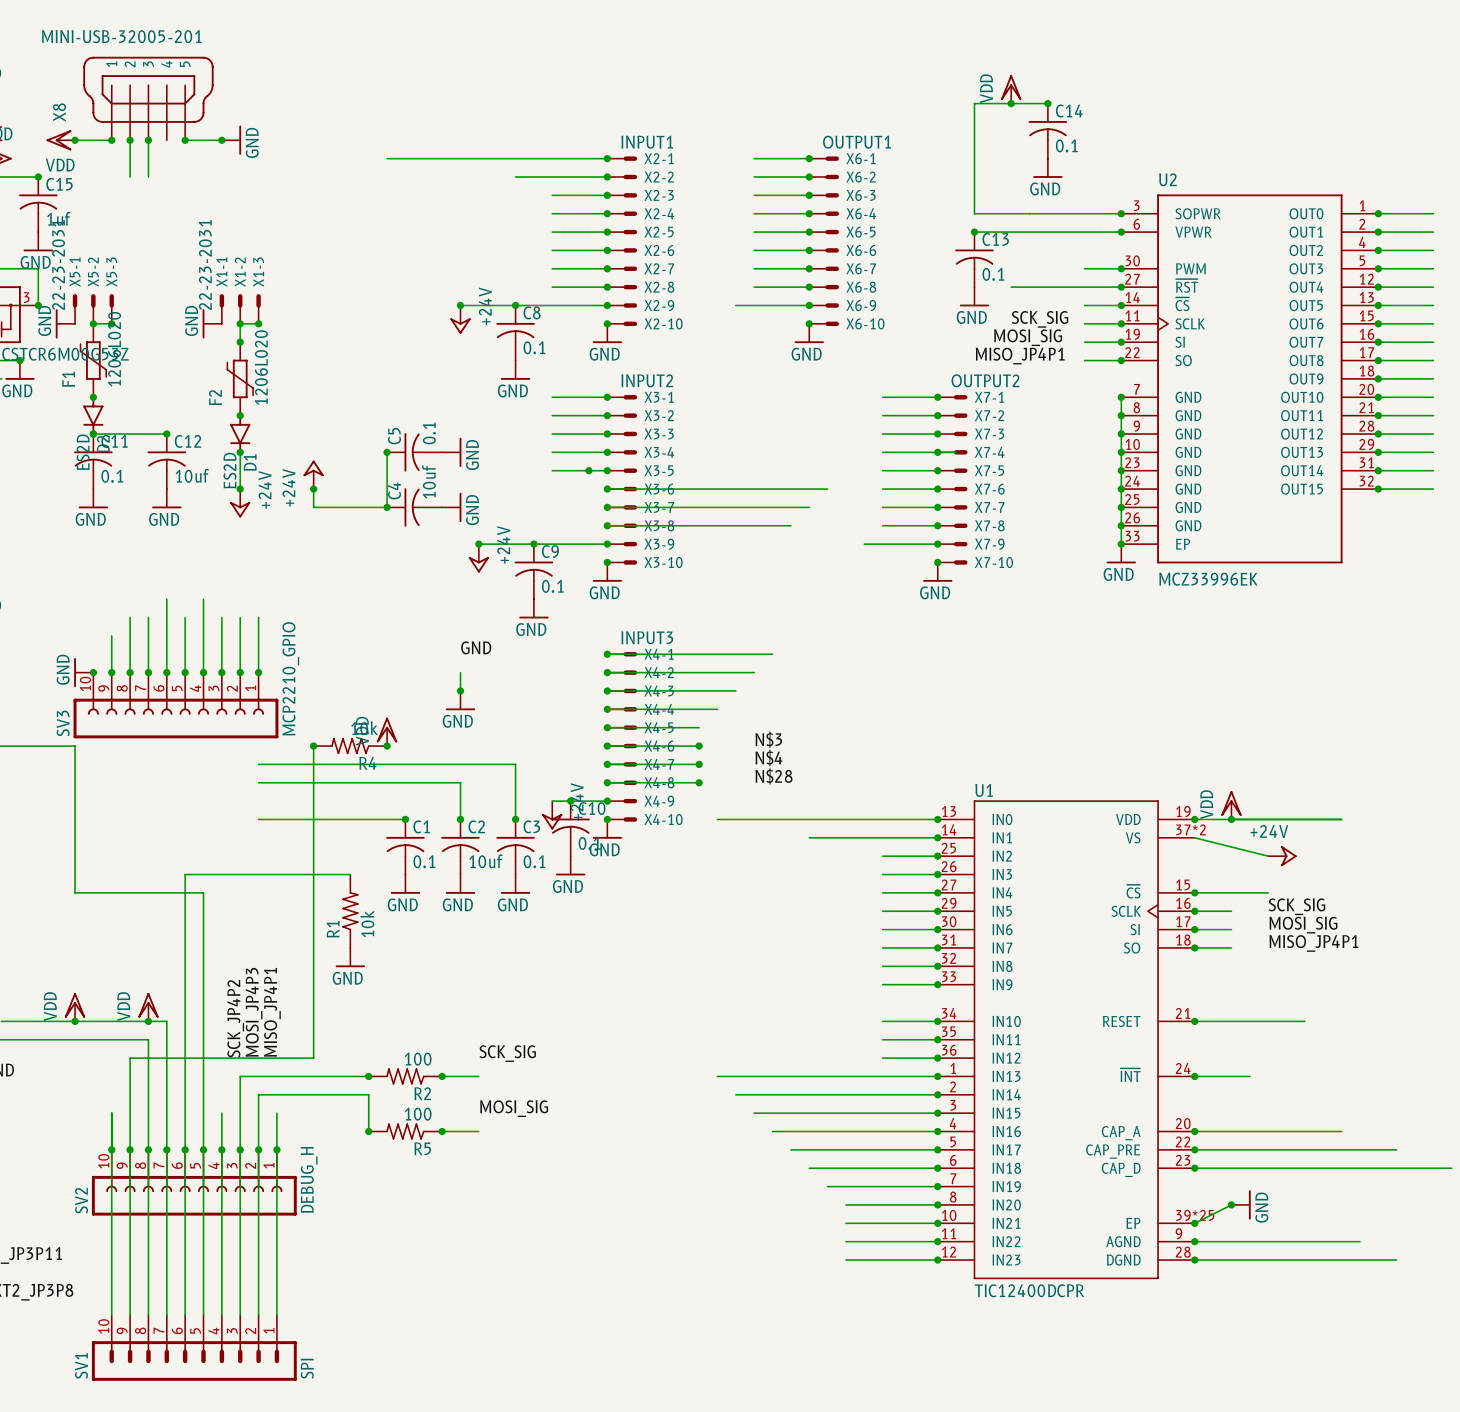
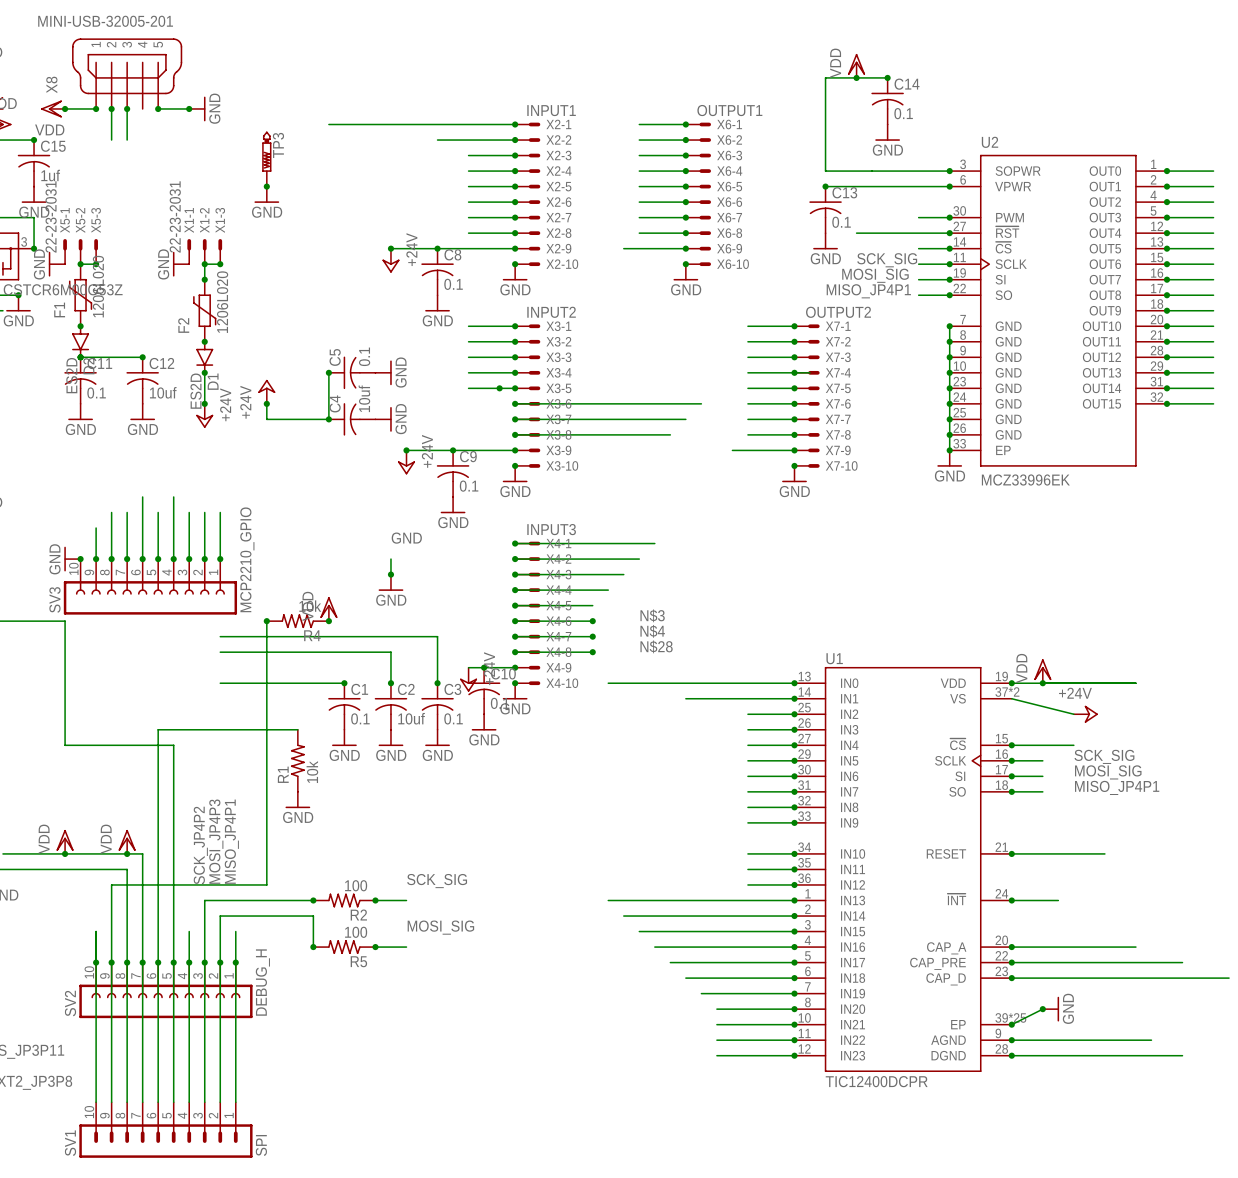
TP3: none -> (266, 159)
junction: none -> (266, 186)
power symbol: none -> GND (266, 194)

